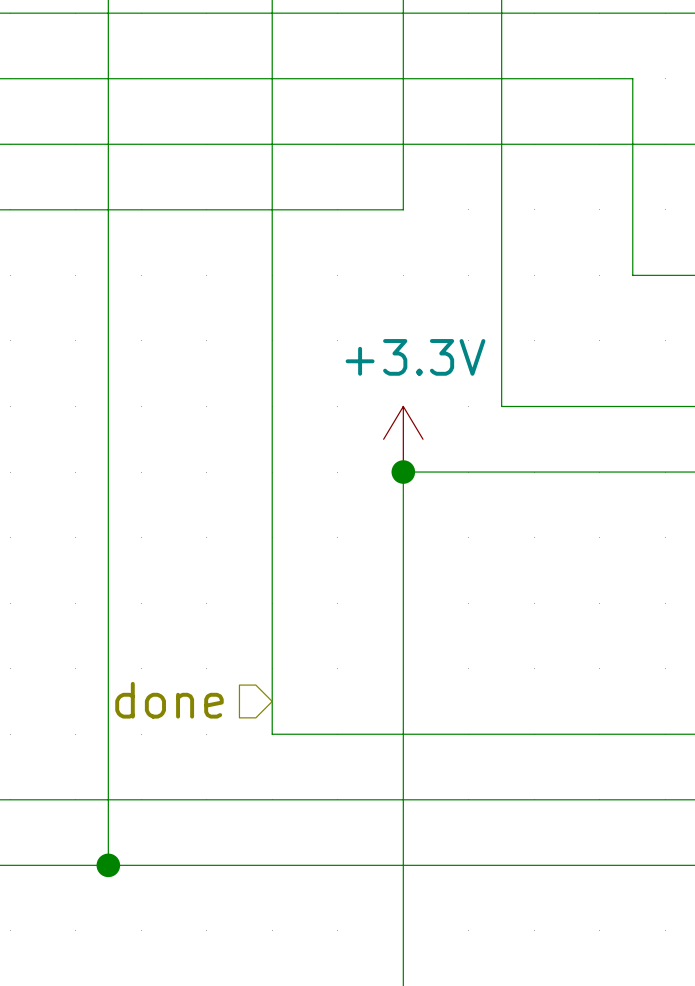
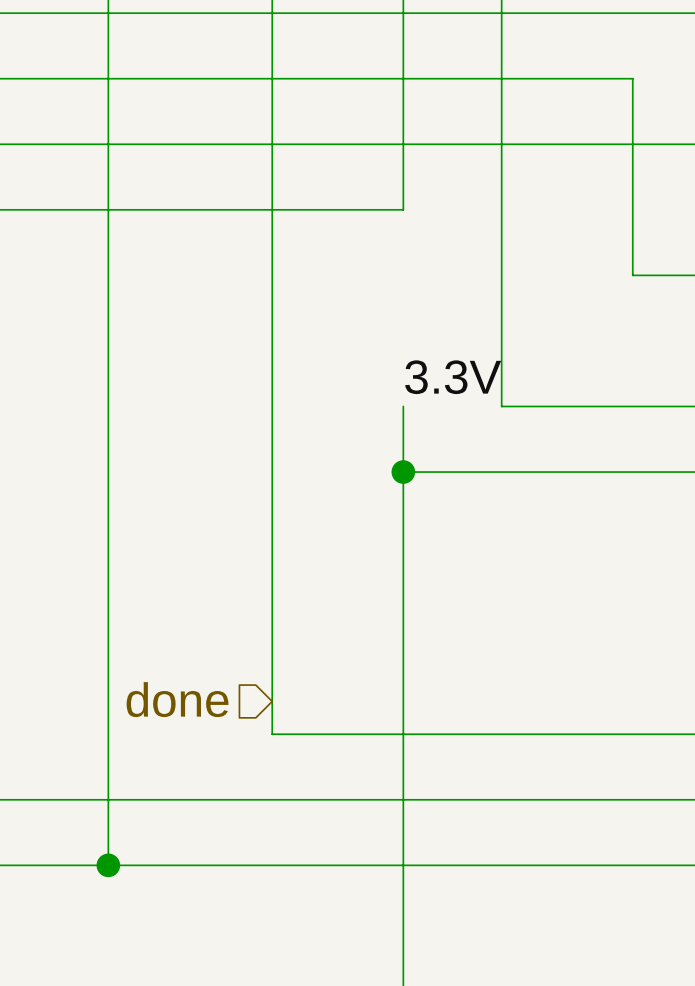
label: none -> 3.3V (453, 377)
power symbol: +3.3V (403, 439) -> none

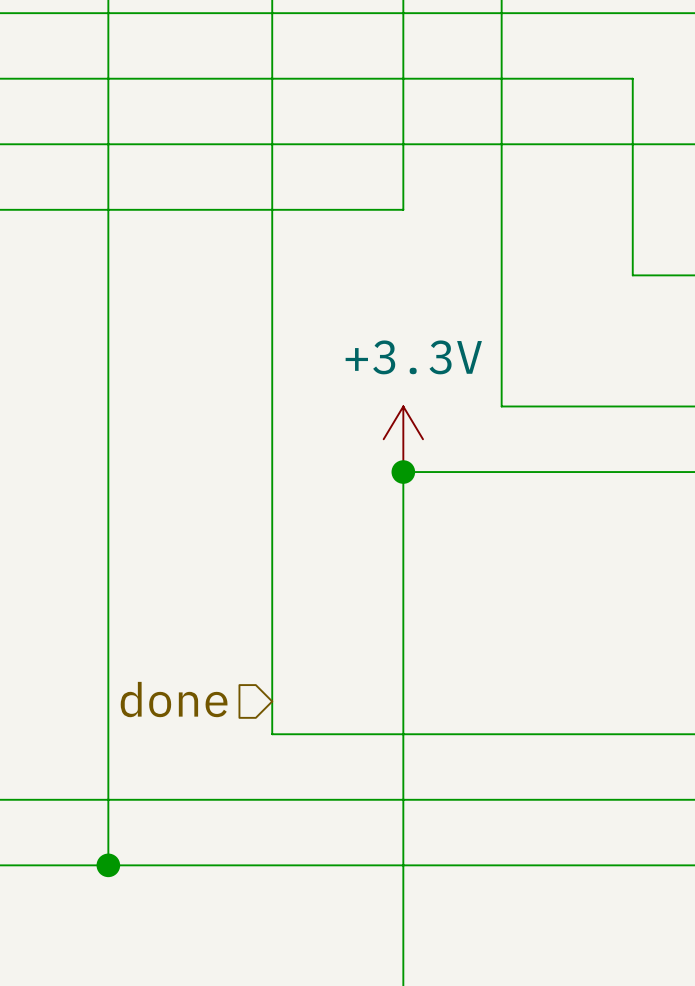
label: 3.3V (453, 377) -> none
power symbol: none -> +3.3V (403, 439)

